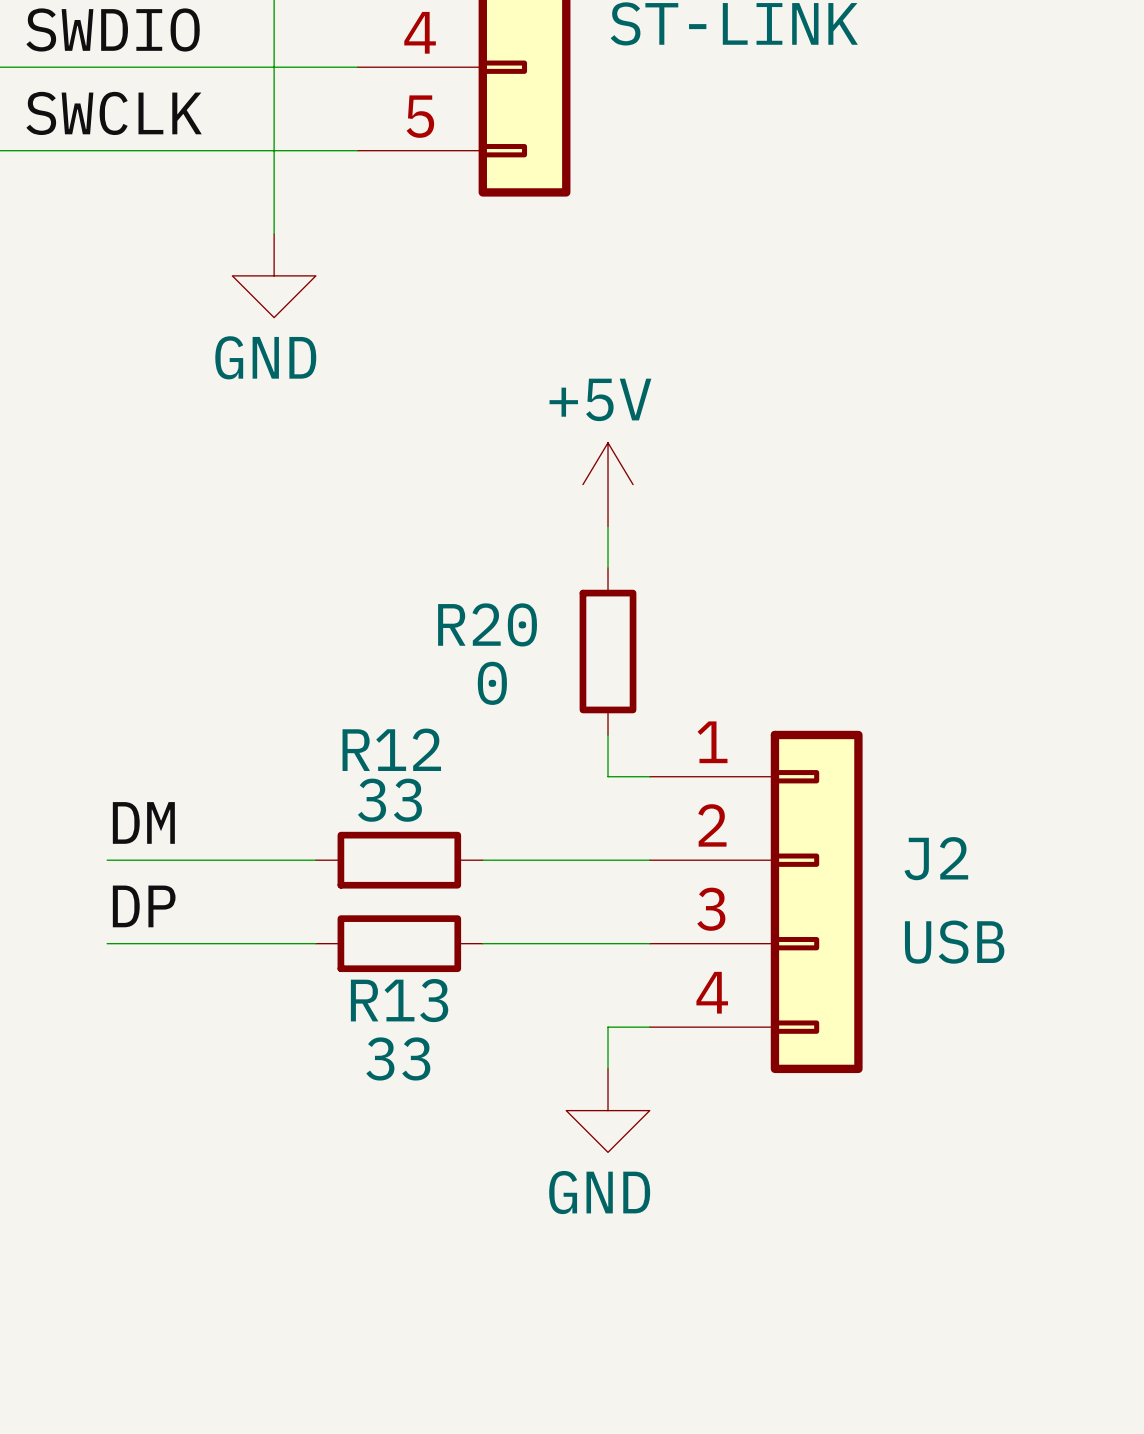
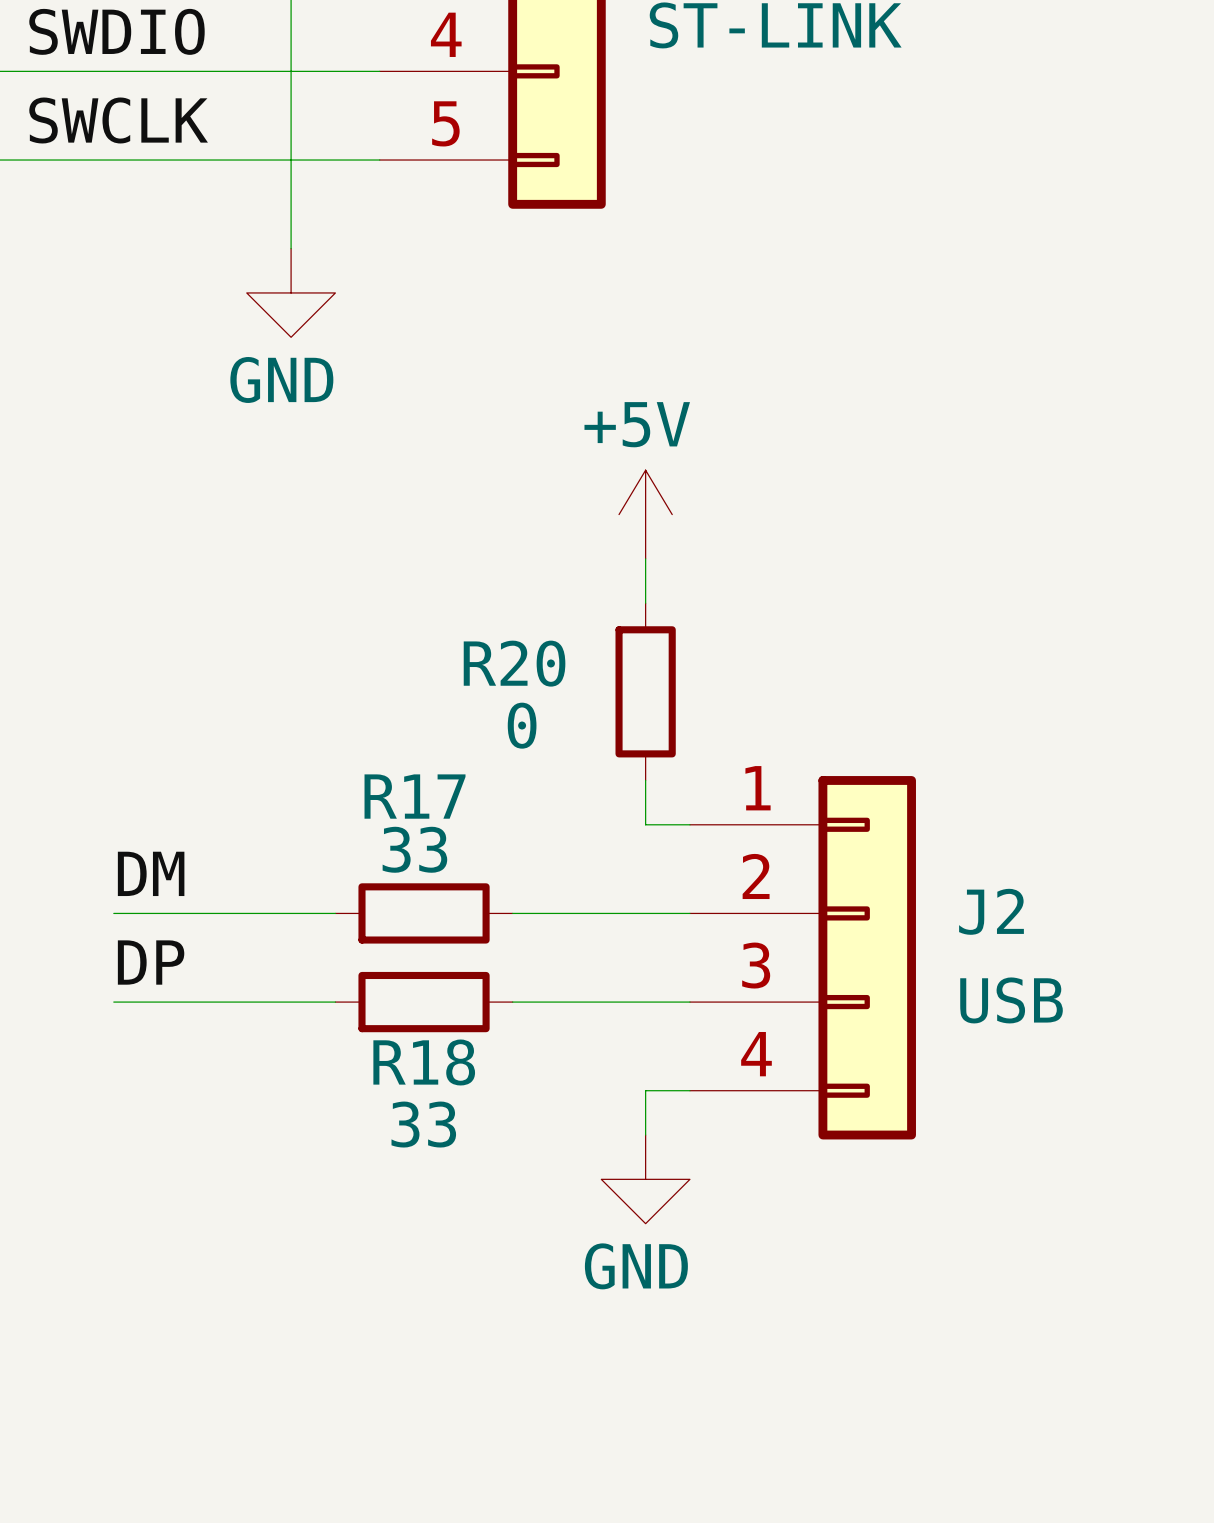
R12 name: R12 (391, 749) -> R17 (415, 796)
R13 name: R13 (399, 1000) -> R18 (424, 1062)

